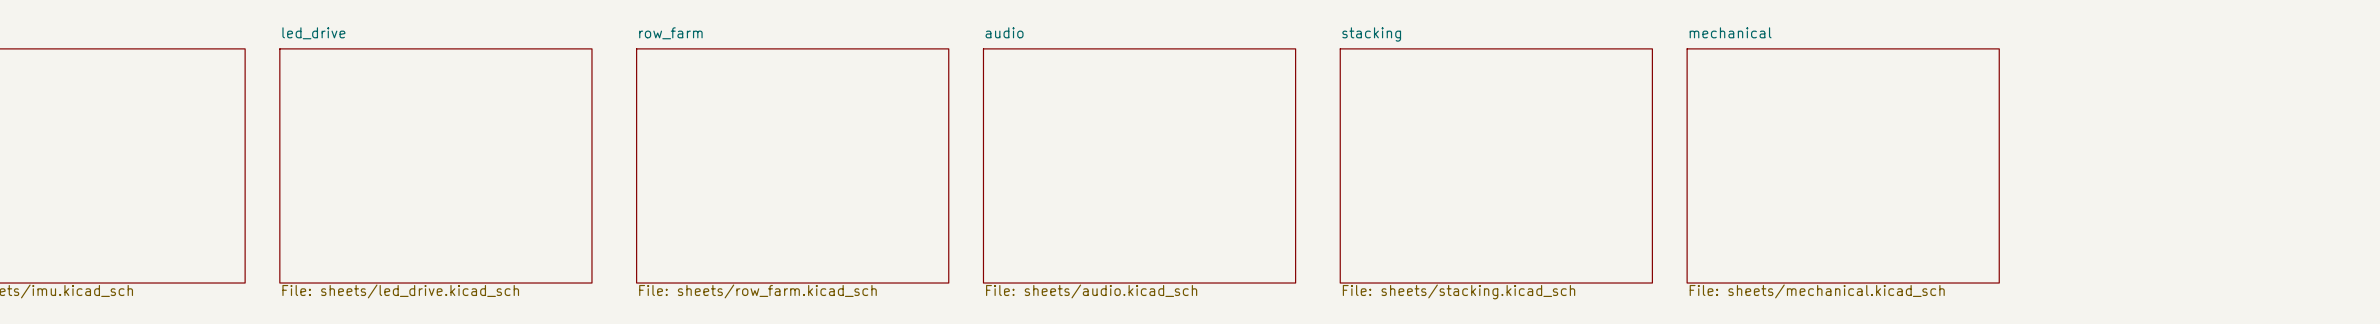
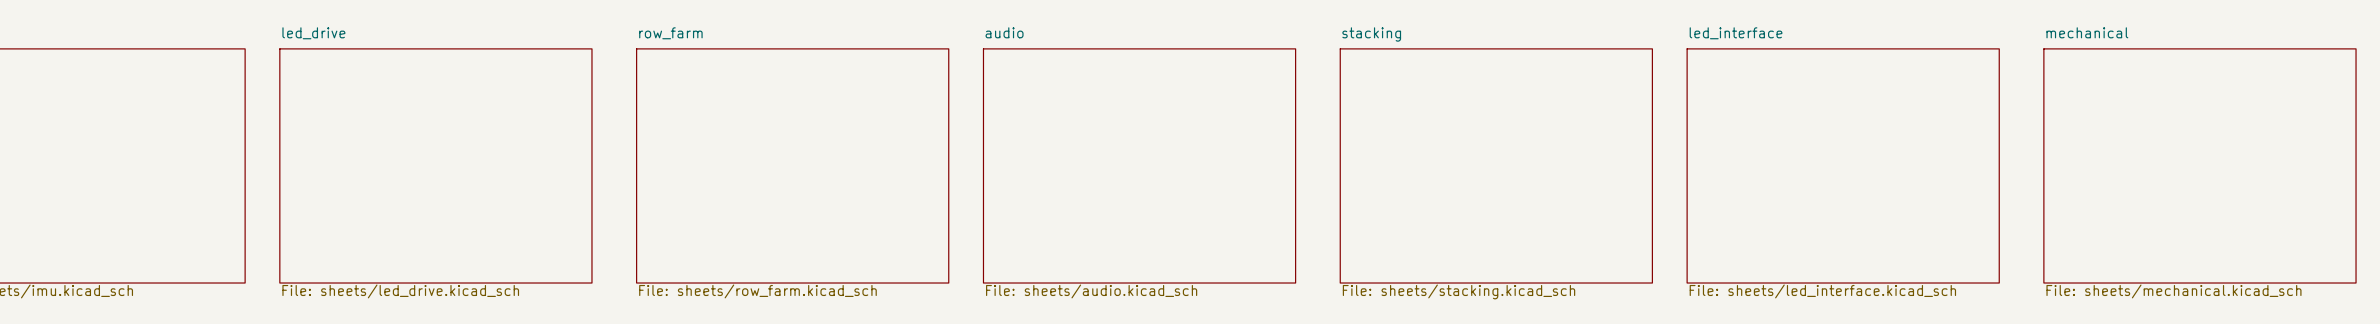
sheet mechanical name: mechanical (1730, 32) -> led_interface (1736, 33)
sheet mechanical: none -> File: sheets/mechanical.kicad_sch (2199, 165)
sheet mechanical value: File: sheets/mechanical.kicad_sch (1817, 291) -> File: sheets/led_interface.kicad_sch (1822, 291)

